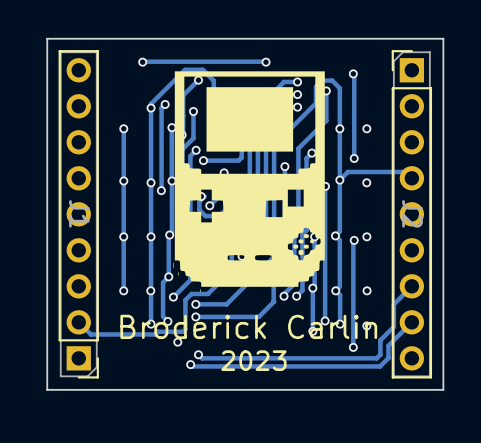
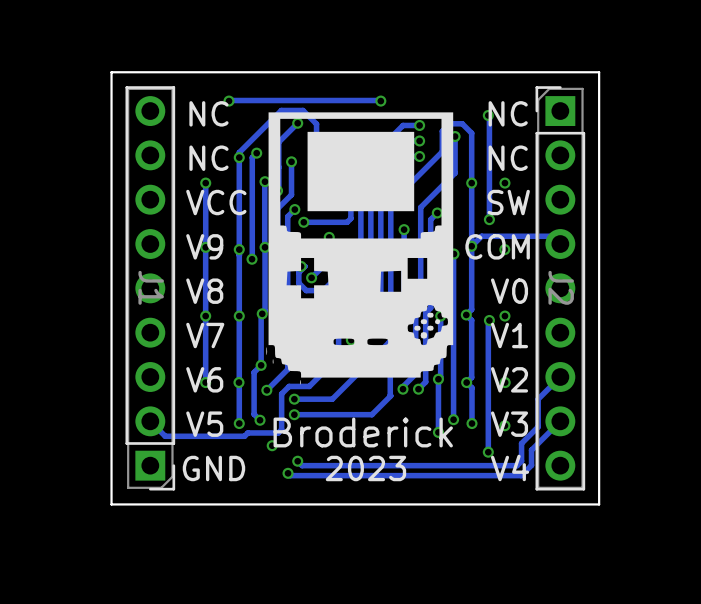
text: none -> NC (208, 113)
text: none -> NC (508, 113)
text: none -> NC (208, 158)
text: none -> NC (508, 158)
text: none -> VCC (216, 202)
text: none -> SW (508, 202)
text: none -> V9 (204, 246)
text: none -> COM (497, 246)
text: none -> V8 (204, 291)
text: none -> V0 (509, 291)
text: none -> V7 (205, 335)
text: none -> V1 (509, 335)
text: none -> V6 (204, 379)
text: none -> V2 (509, 379)
text: none -> V3 (509, 424)
text: Broderick Carlin (248, 326) -> V5 (204, 424)
text: none -> Broderick (363, 432)
text: none -> GND (213, 468)
text: none -> V4 (510, 467)

